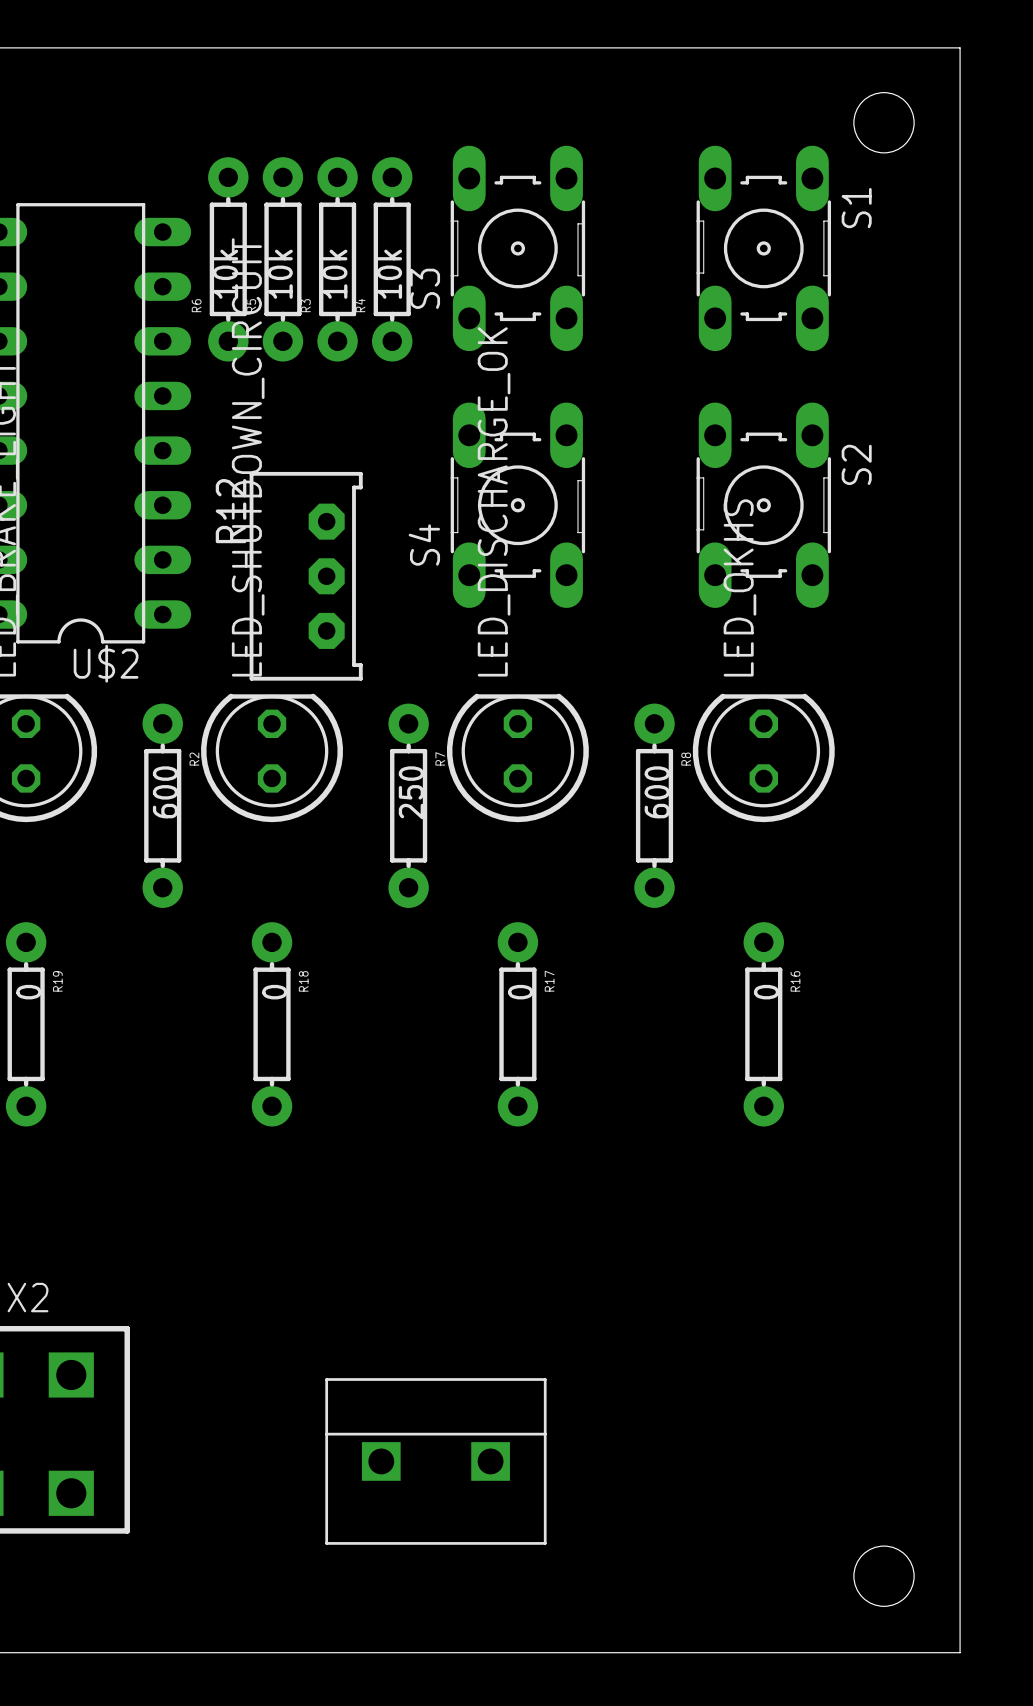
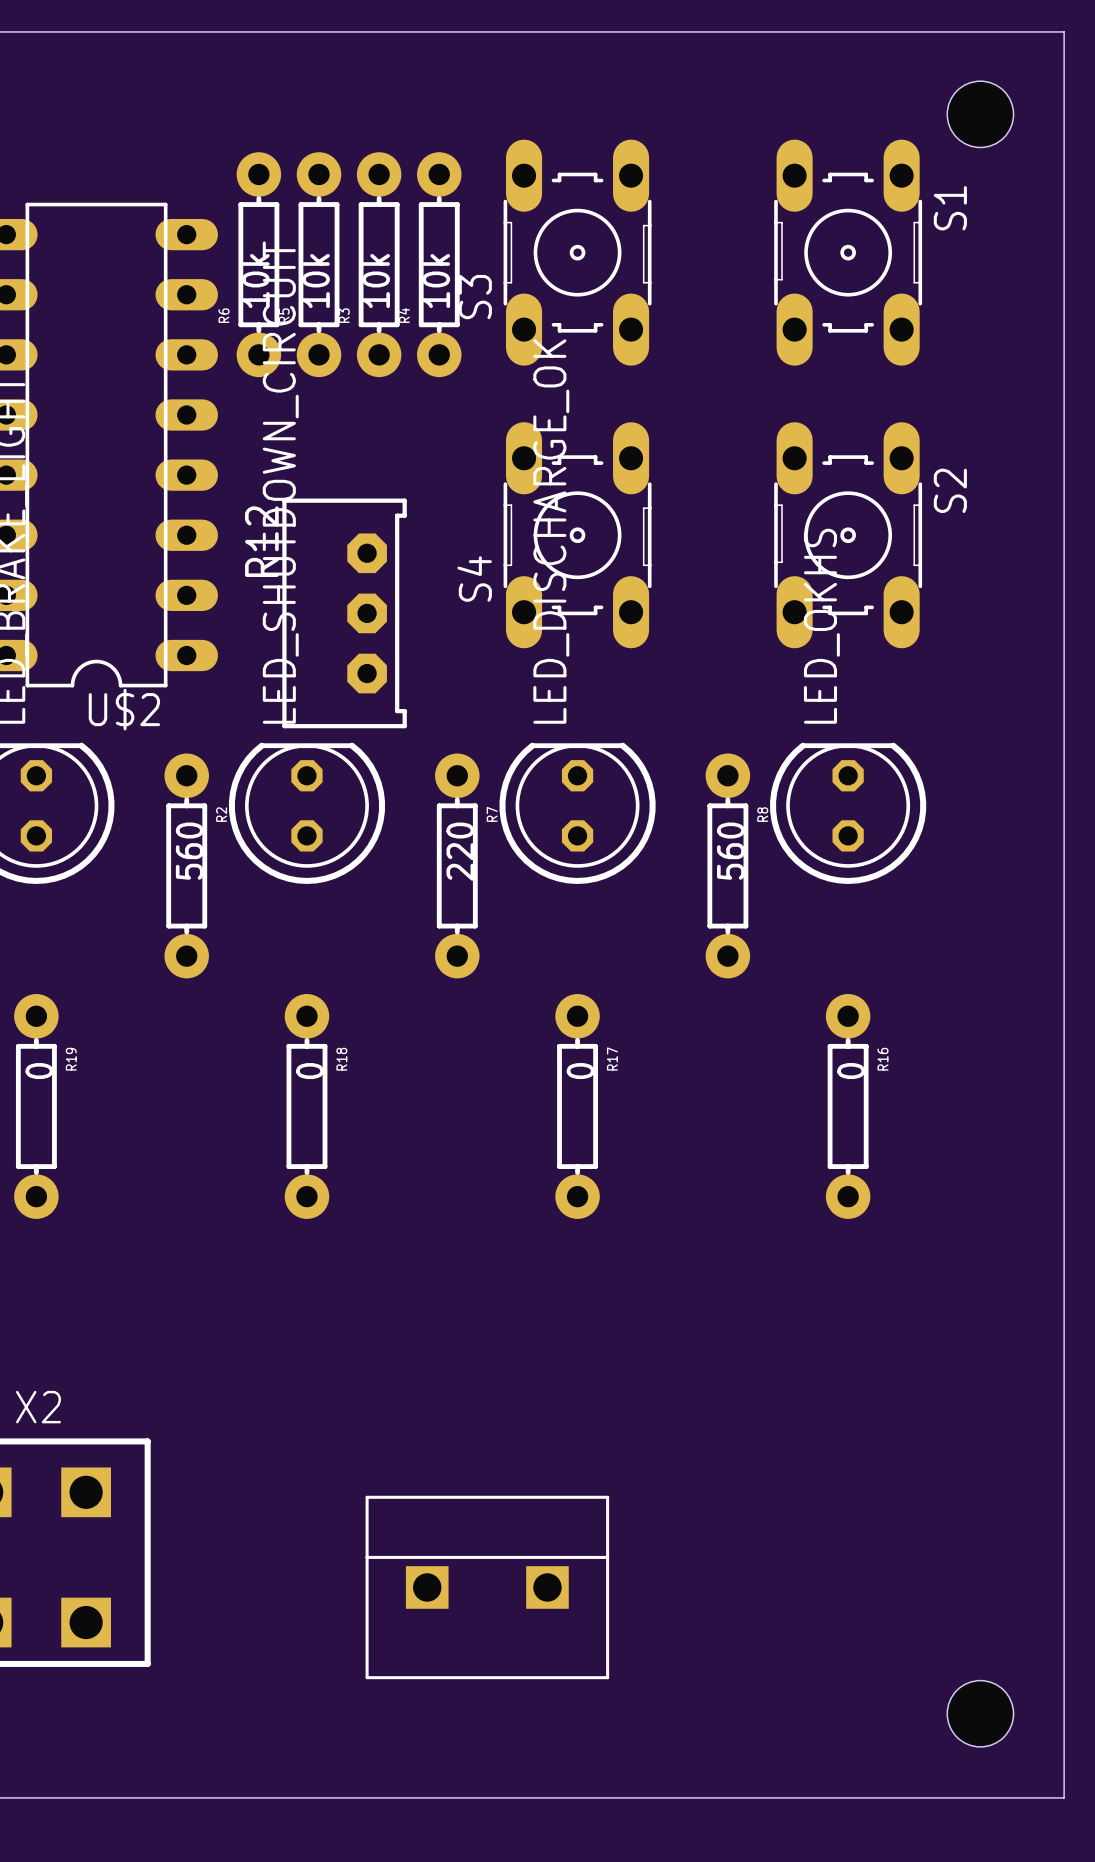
R2 value: 600 (165, 792) -> 560 (189, 851)
R7 value: 250 (411, 792) -> 220 (460, 851)
R8 value: 600 (657, 792) -> 560 (730, 851)

